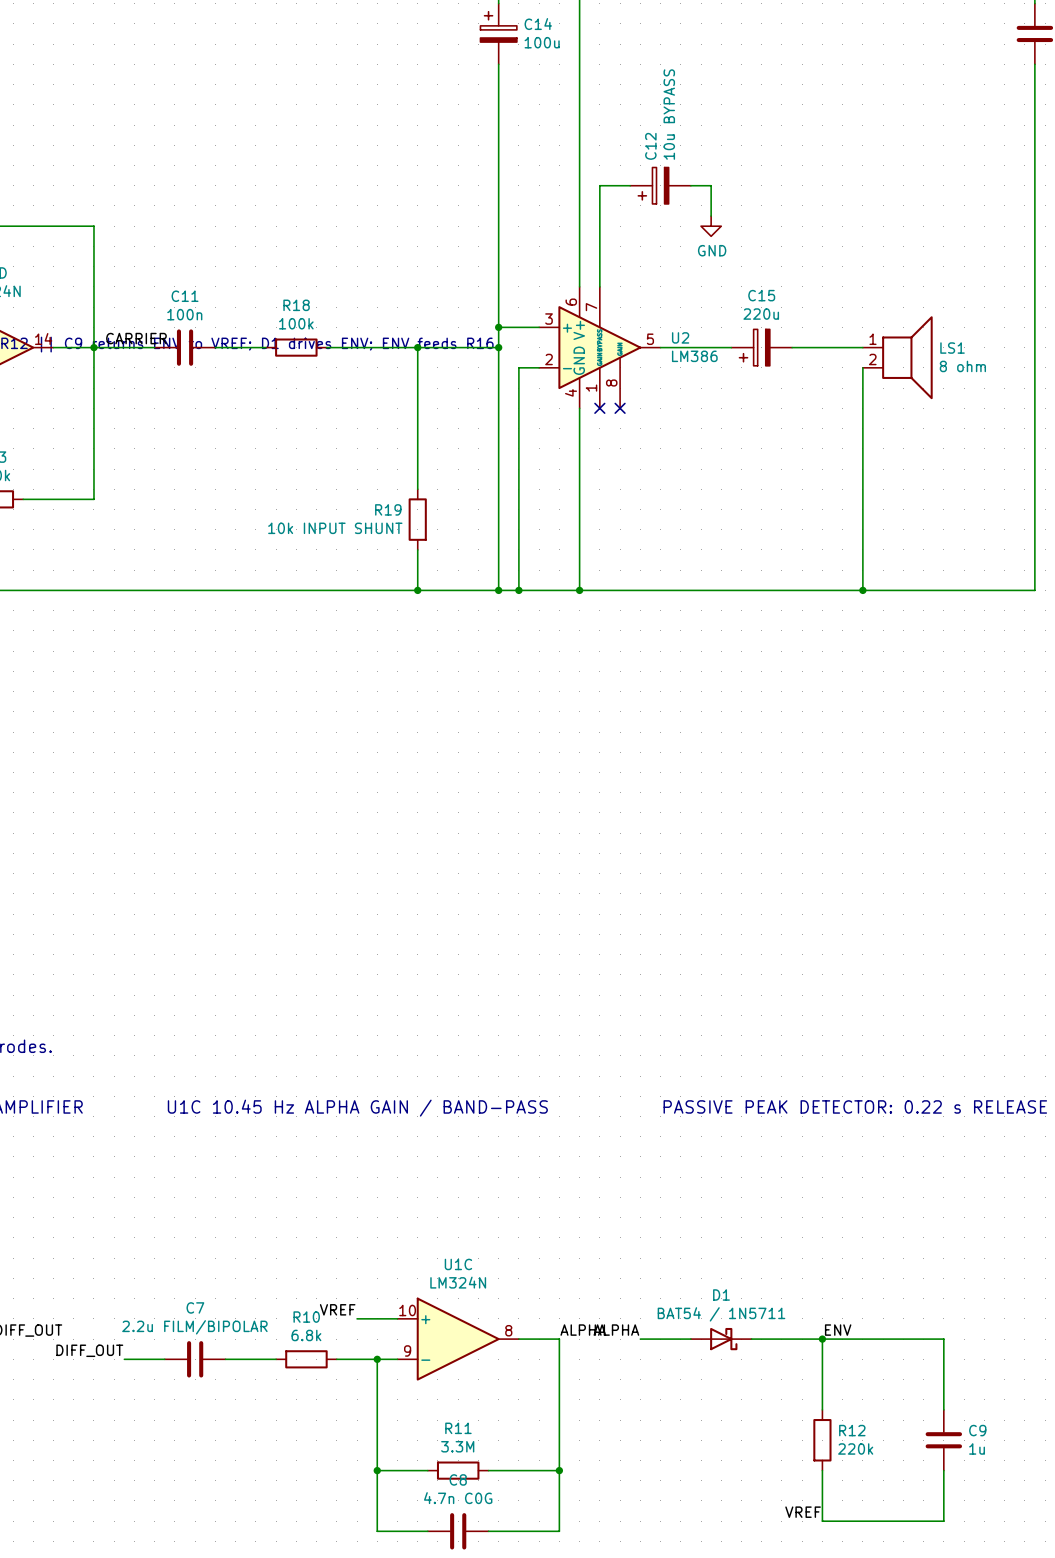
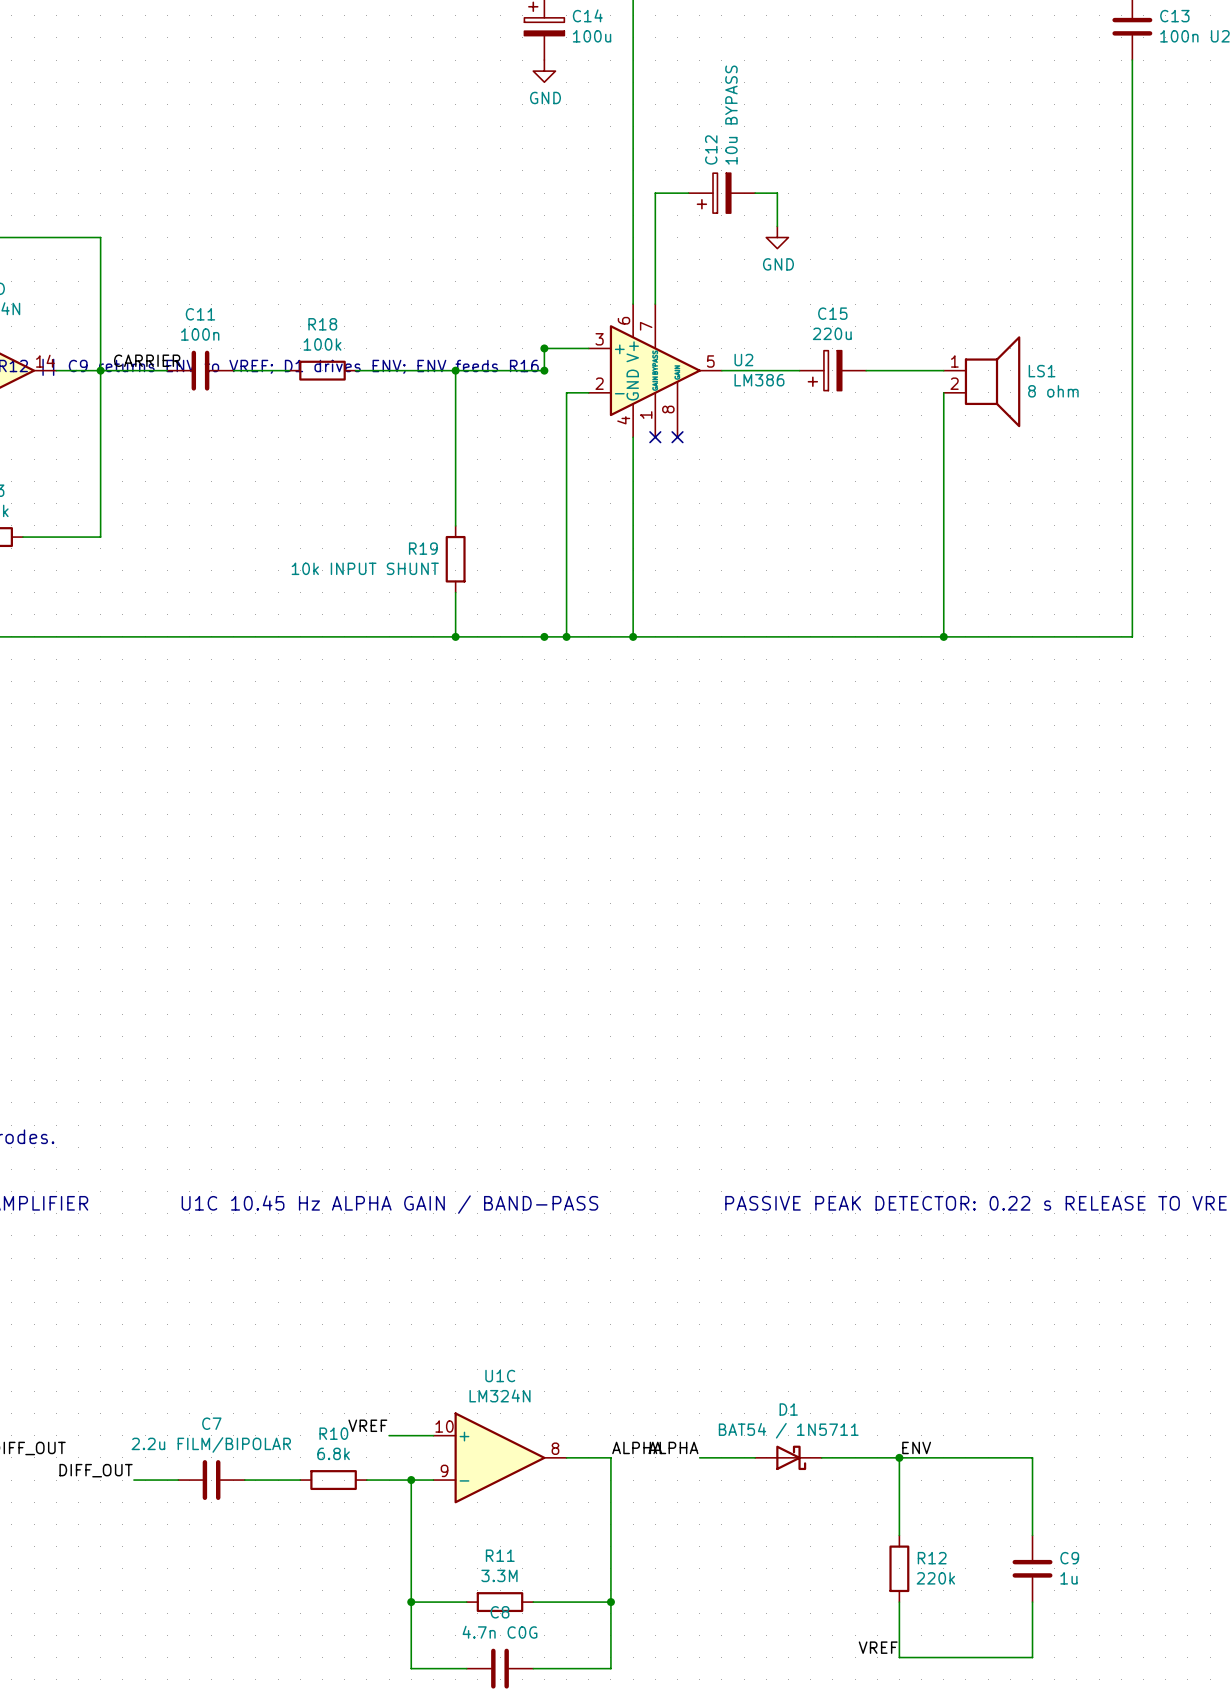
wire: (498, 64) (498, 327) -> none
power symbol: none -> GND (544, 71)
wire: (498, 347) (498, 590) -> none

